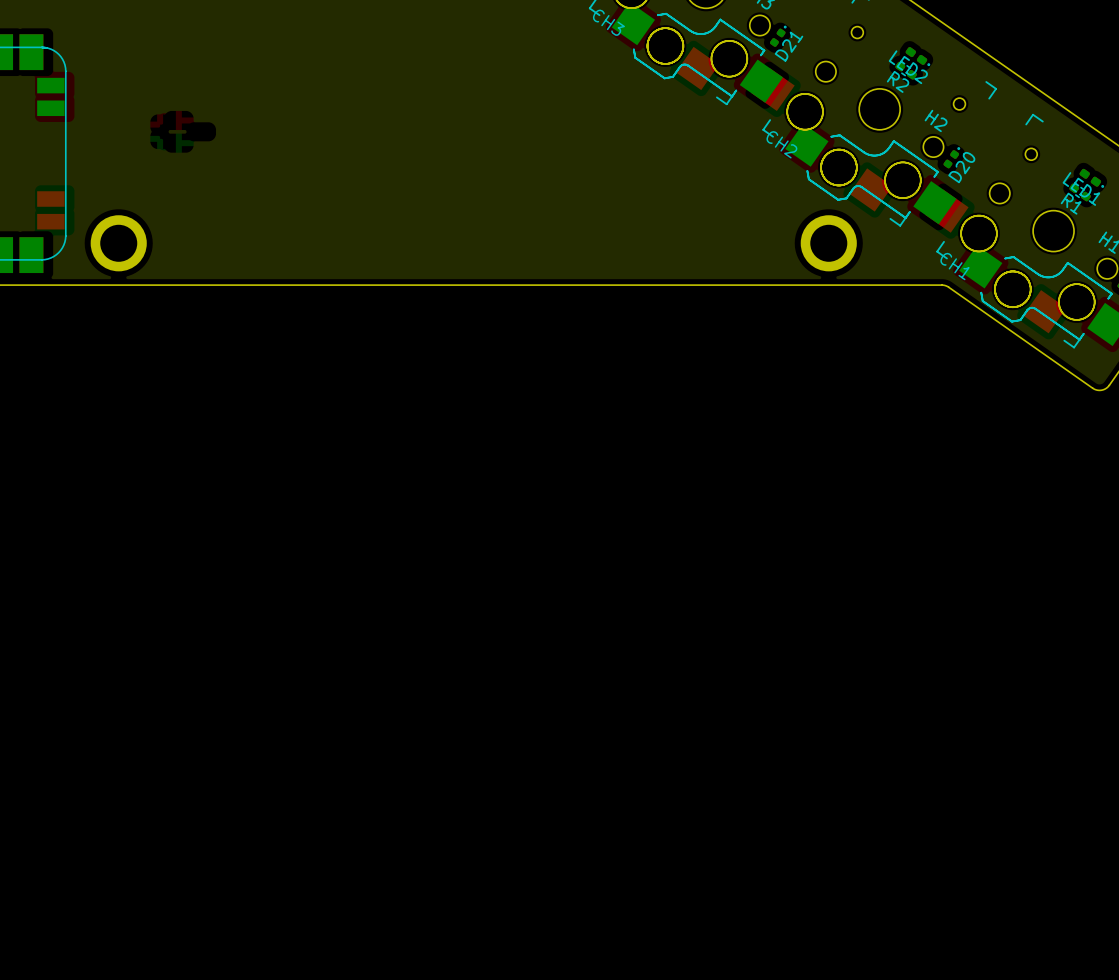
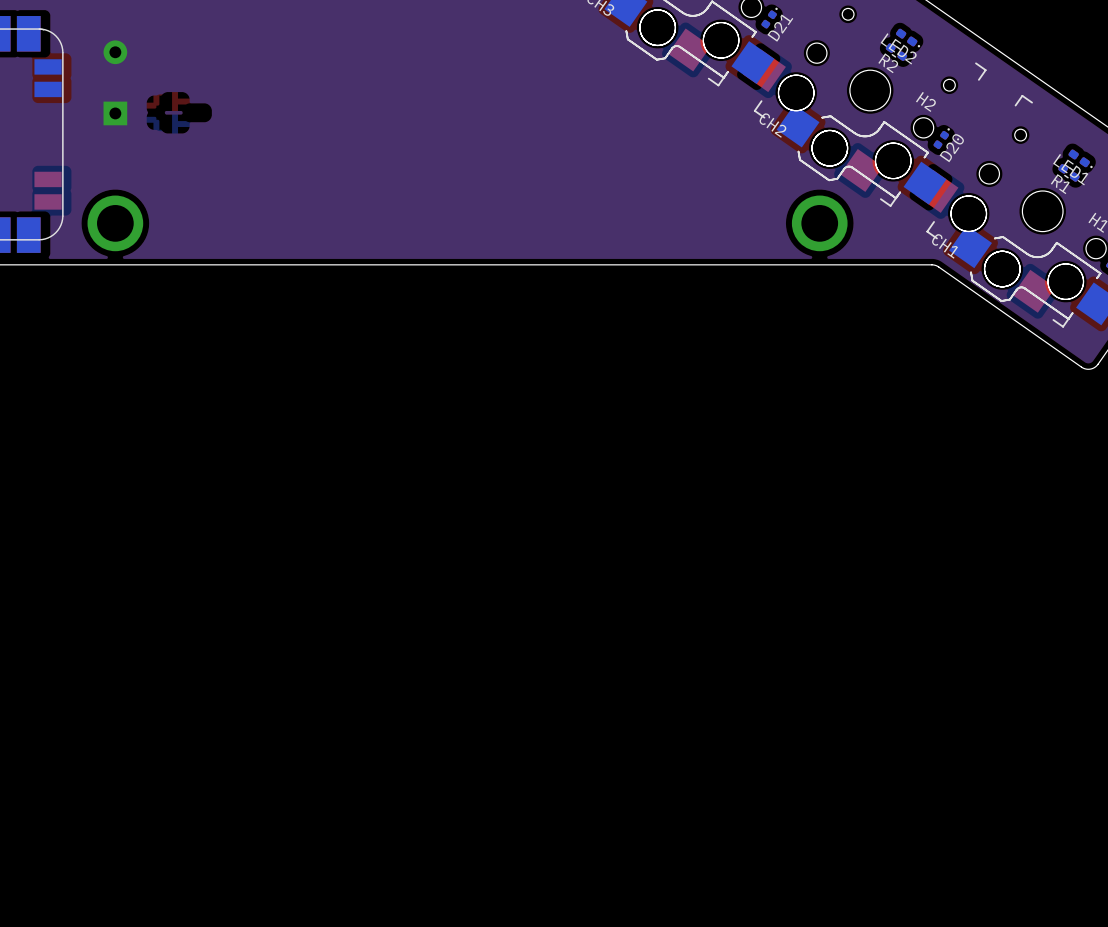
part: none -> (115, 52)
part: none -> (115, 113)

